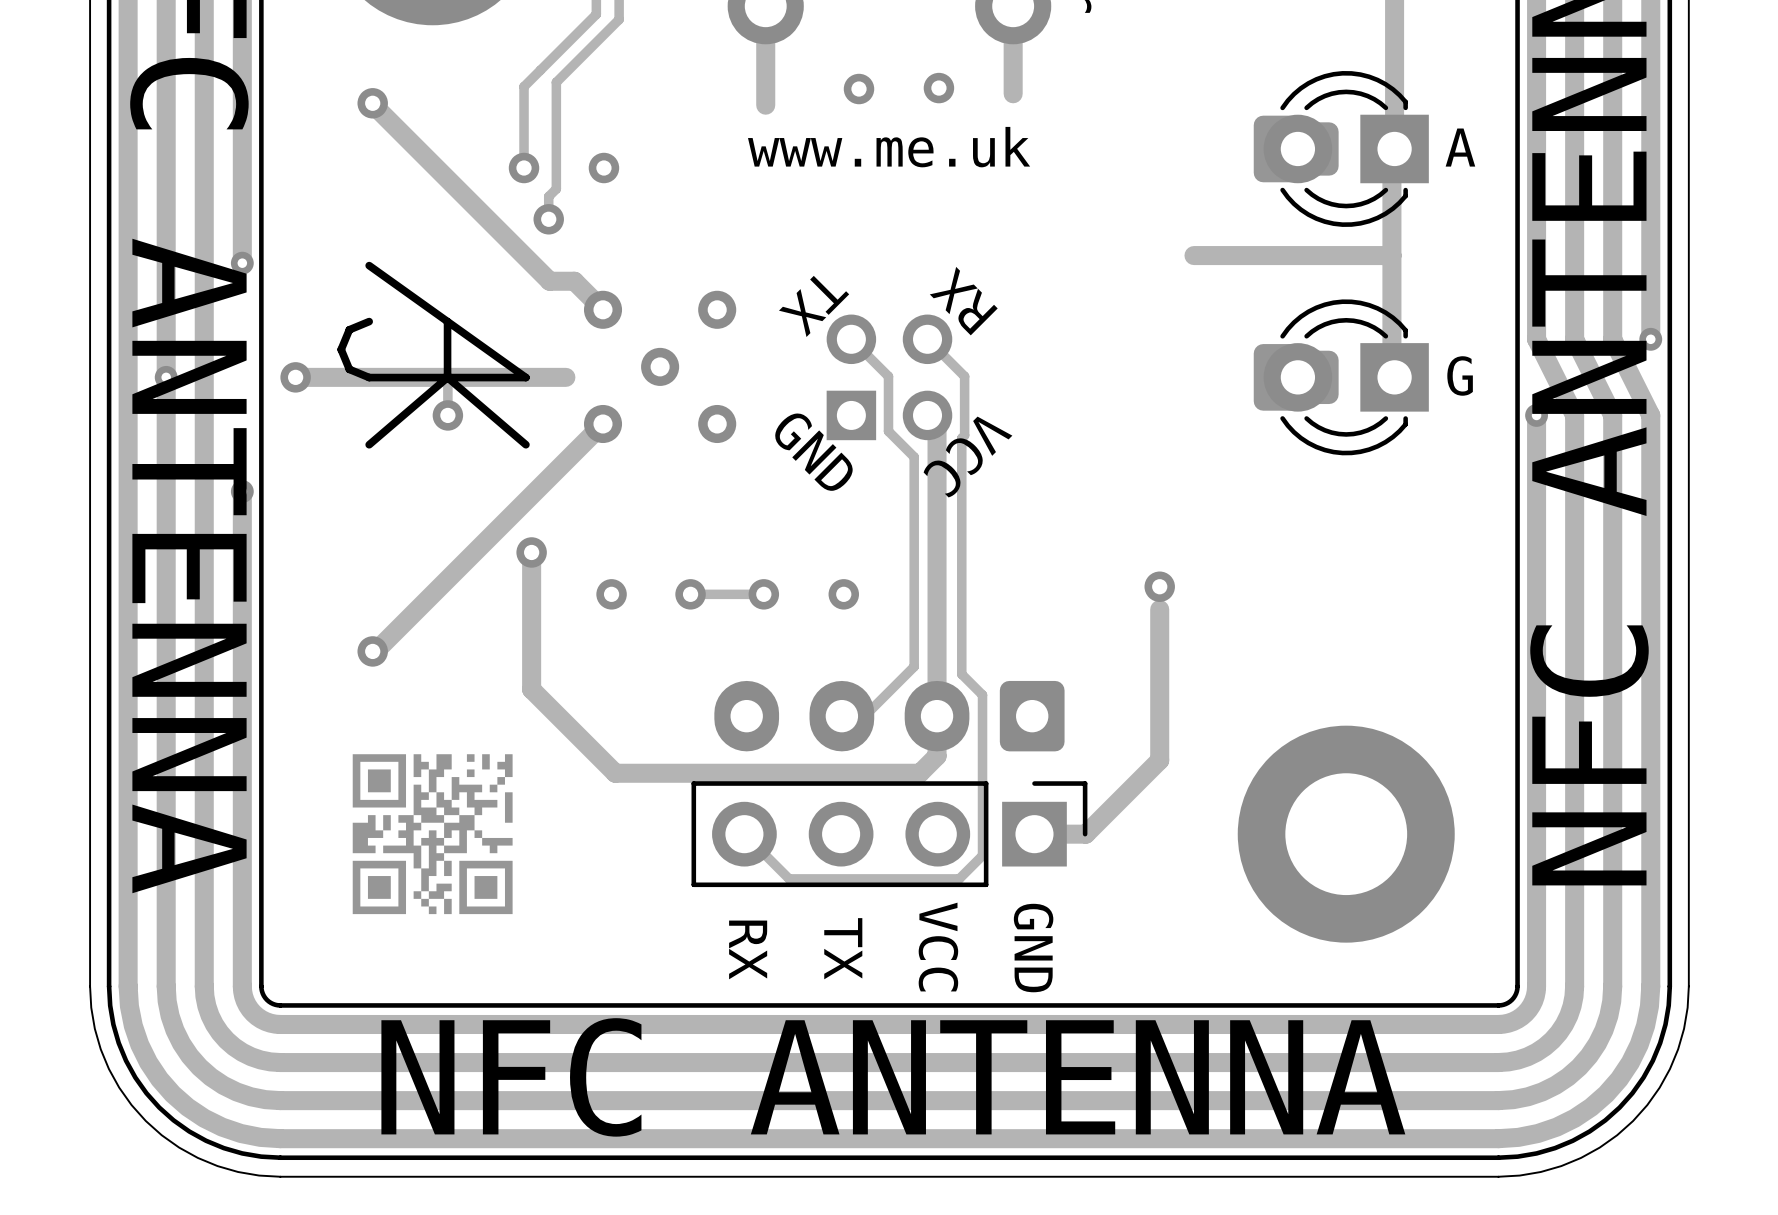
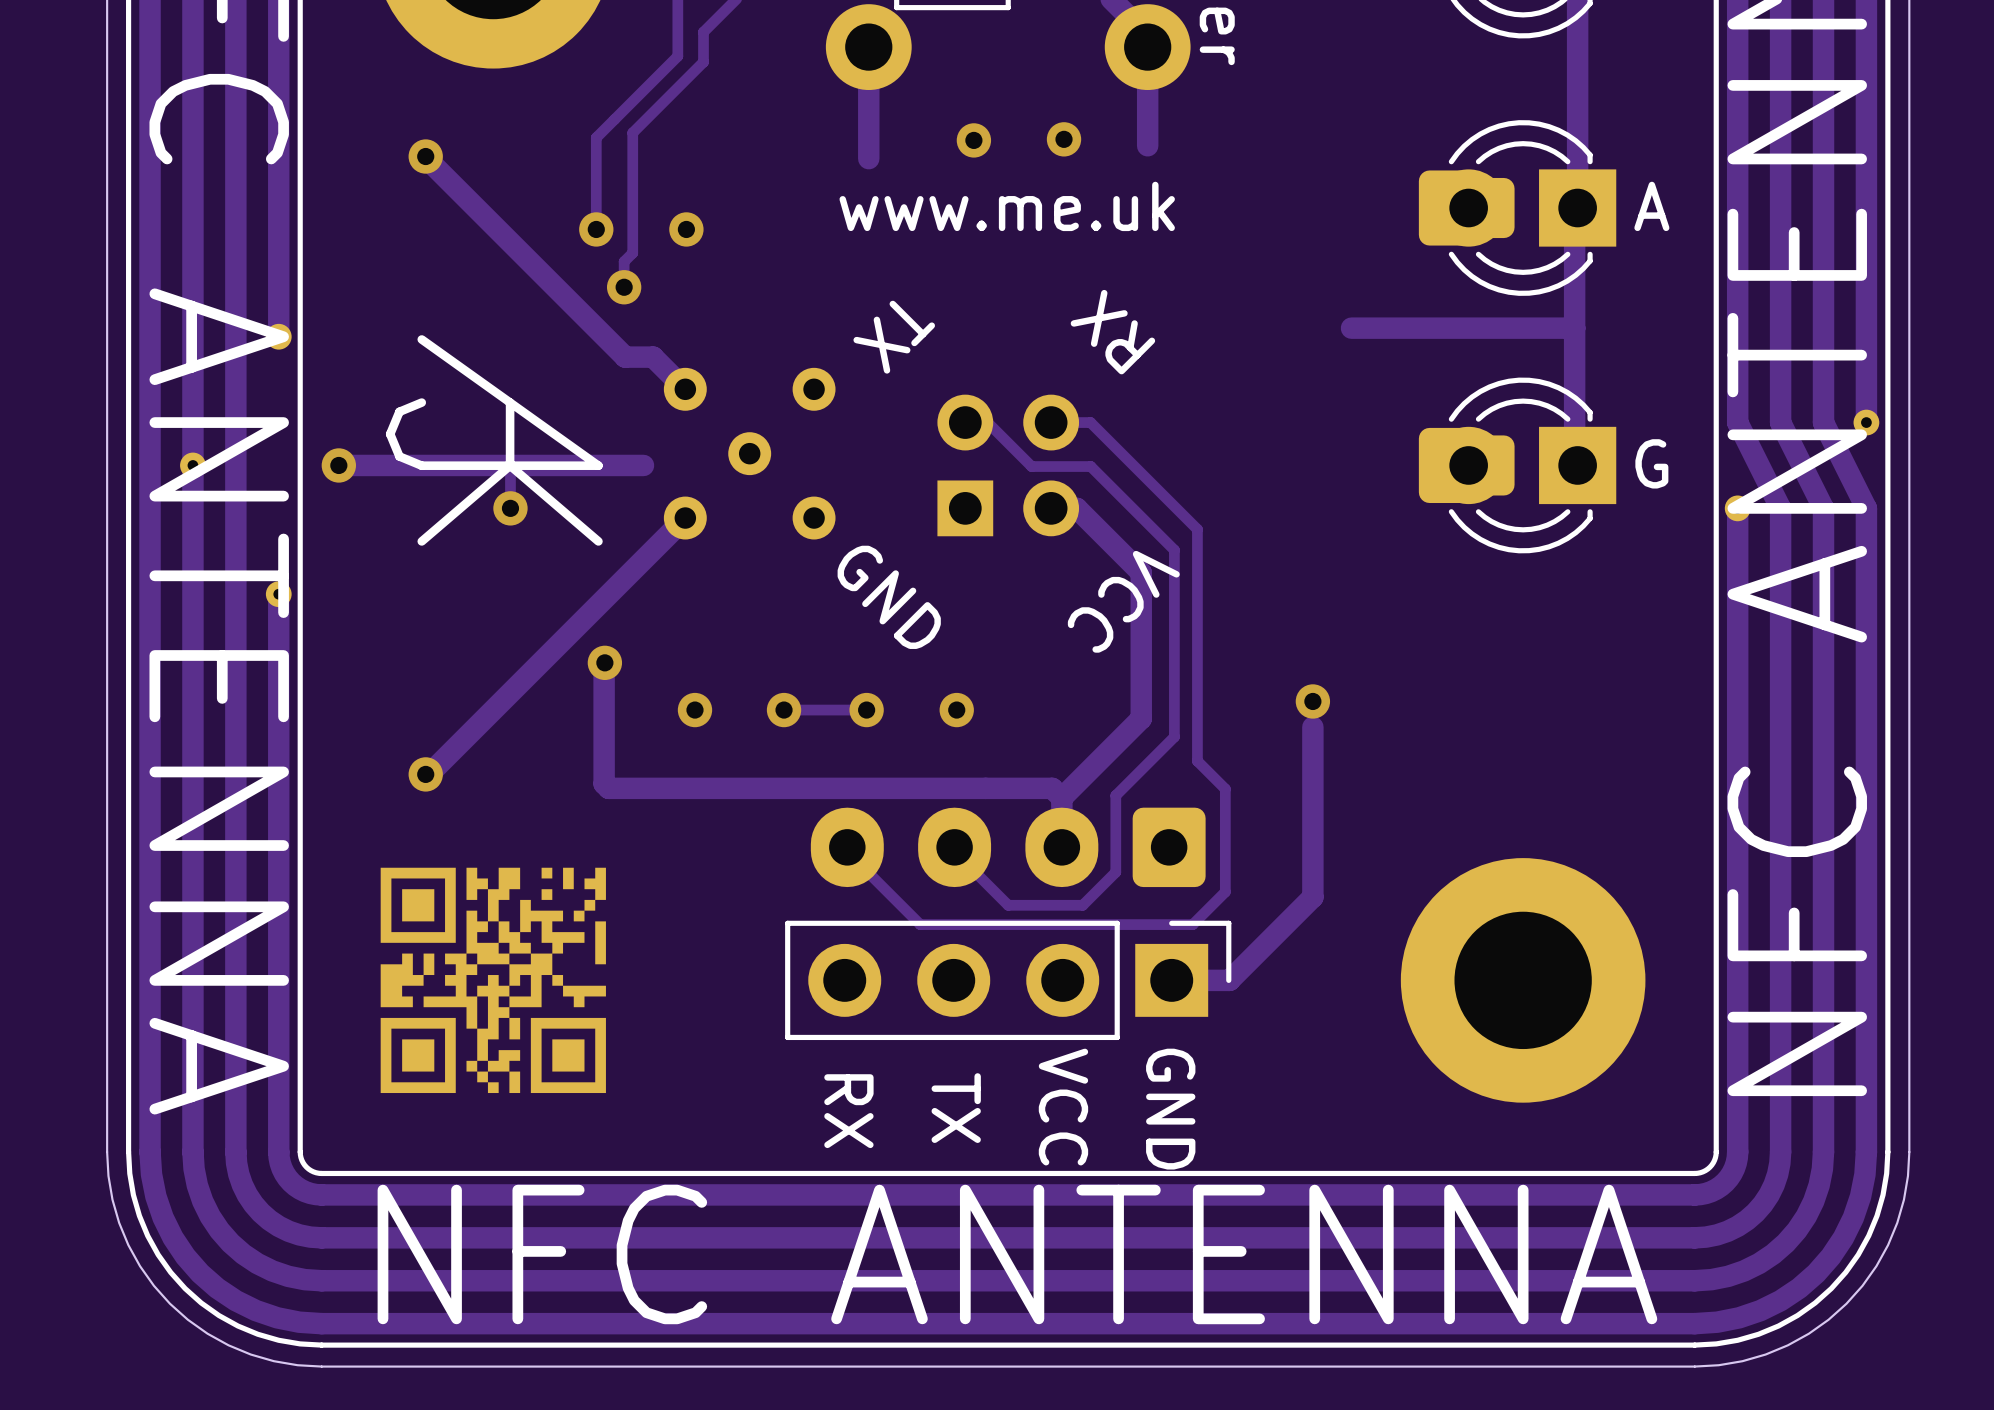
text position: RX (963, 301) -> RX (1112, 332)
text position: TX (814, 306) -> TX (894, 337)
track: (851, 339) (888, 376) (888, 431) (914, 457) (914, 666) (864, 716) (841, 716) -> (965, 422) (987, 422) (1031, 466) (1090, 466) (1174, 550) (1174, 736) (1115, 795) (1115, 872) (1082, 905) (1008, 905) (954, 851)
track: (927, 339) (964, 376) (964, 435) (961, 438) (961, 674) (982, 695) (982, 855) (959, 878) (789, 878) (744, 834) -> (1051, 422) (1090, 422) (1197, 529) (1197, 761) (1225, 789) (1225, 892) (1192, 924) (920, 924) (847, 851)
track: (927, 415) (937, 424) (937, 672) -> none
text position: GND (813, 451) -> GND (889, 597)
text position: VCC (968, 457) -> VCC (1123, 601)
track: (531, 552) (531, 689) (615, 773) (919, 773) (937, 756) (937, 716) -> (604, 662) (604, 783) (608, 788) (1052, 788) (1061, 798) (1141, 718) (1141, 572) (1076, 508) (1051, 508)
part footprint: [352, 754, 513, 915] -> [380, 867, 606, 1094]

